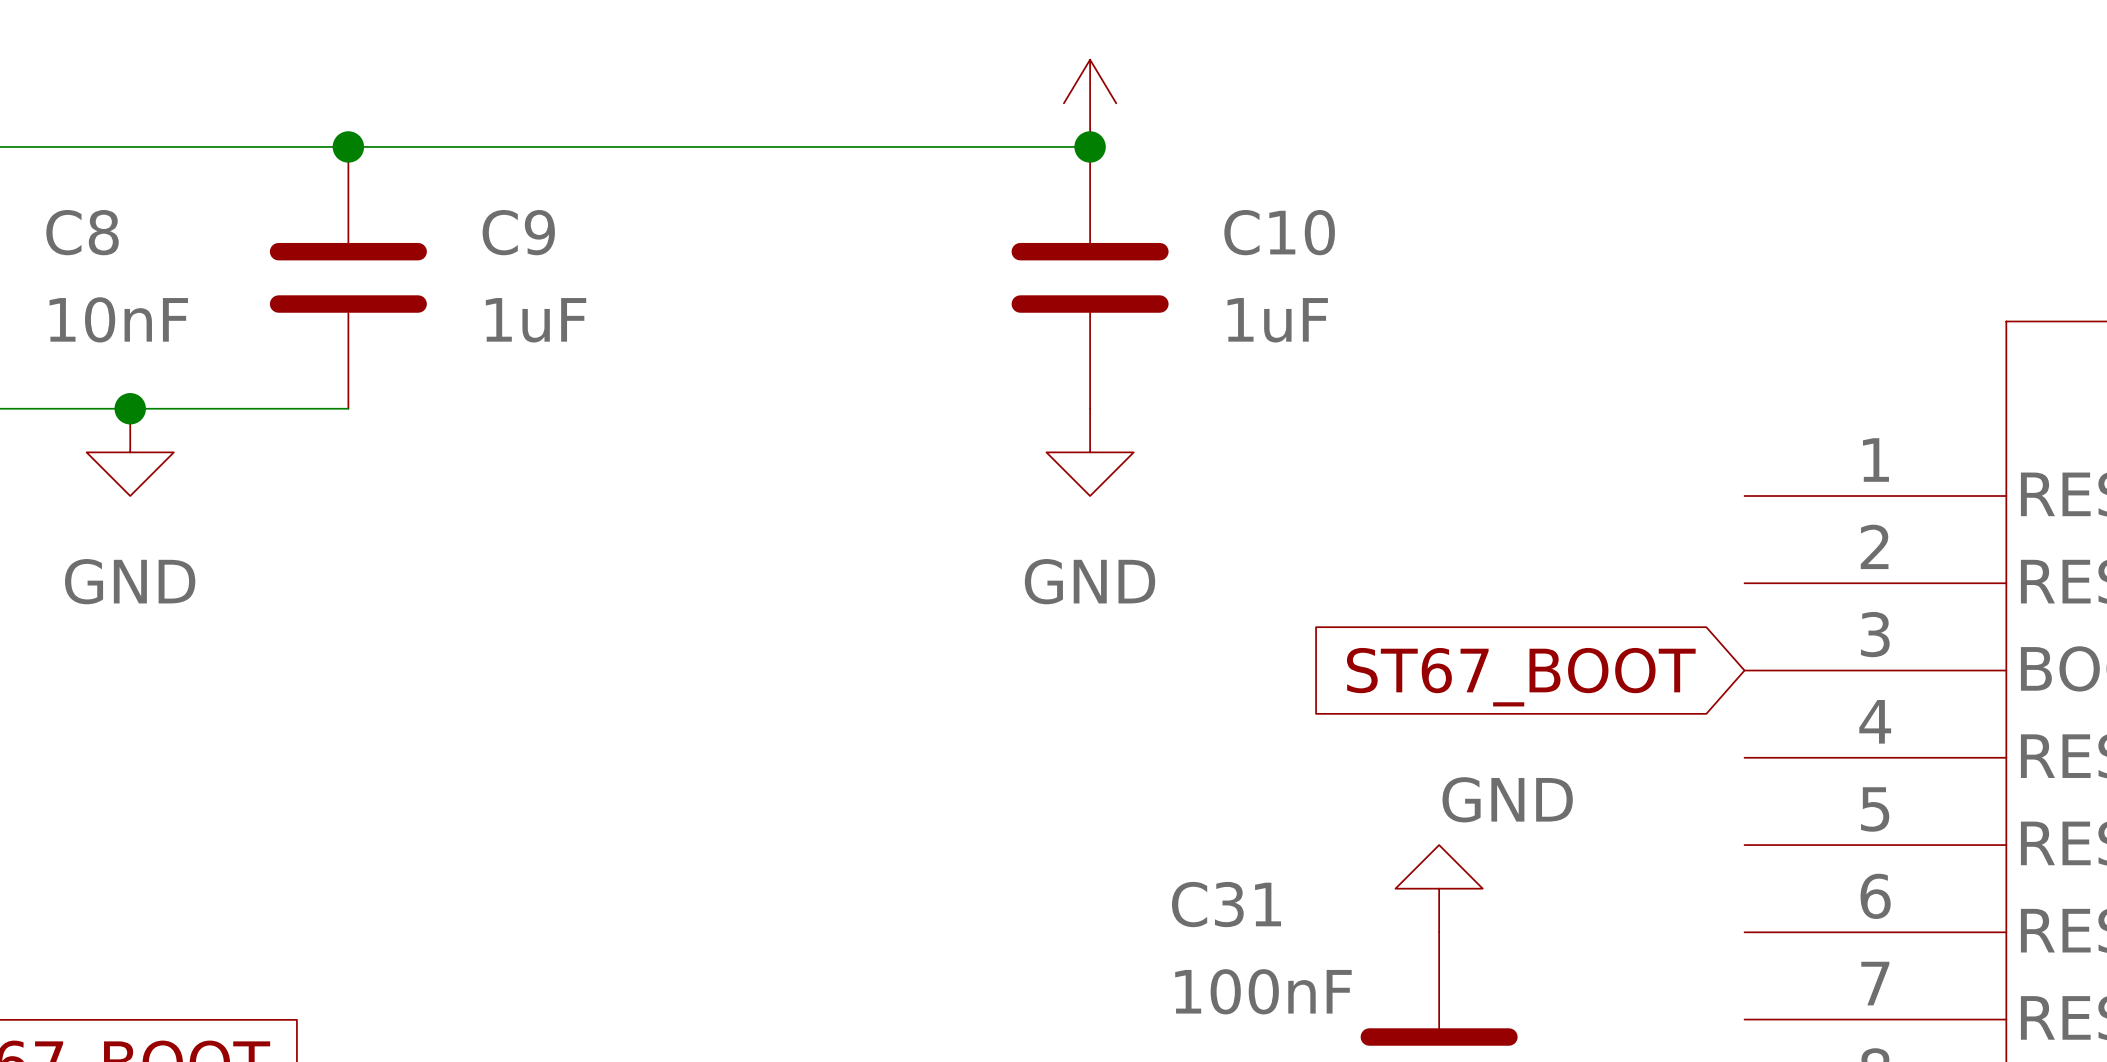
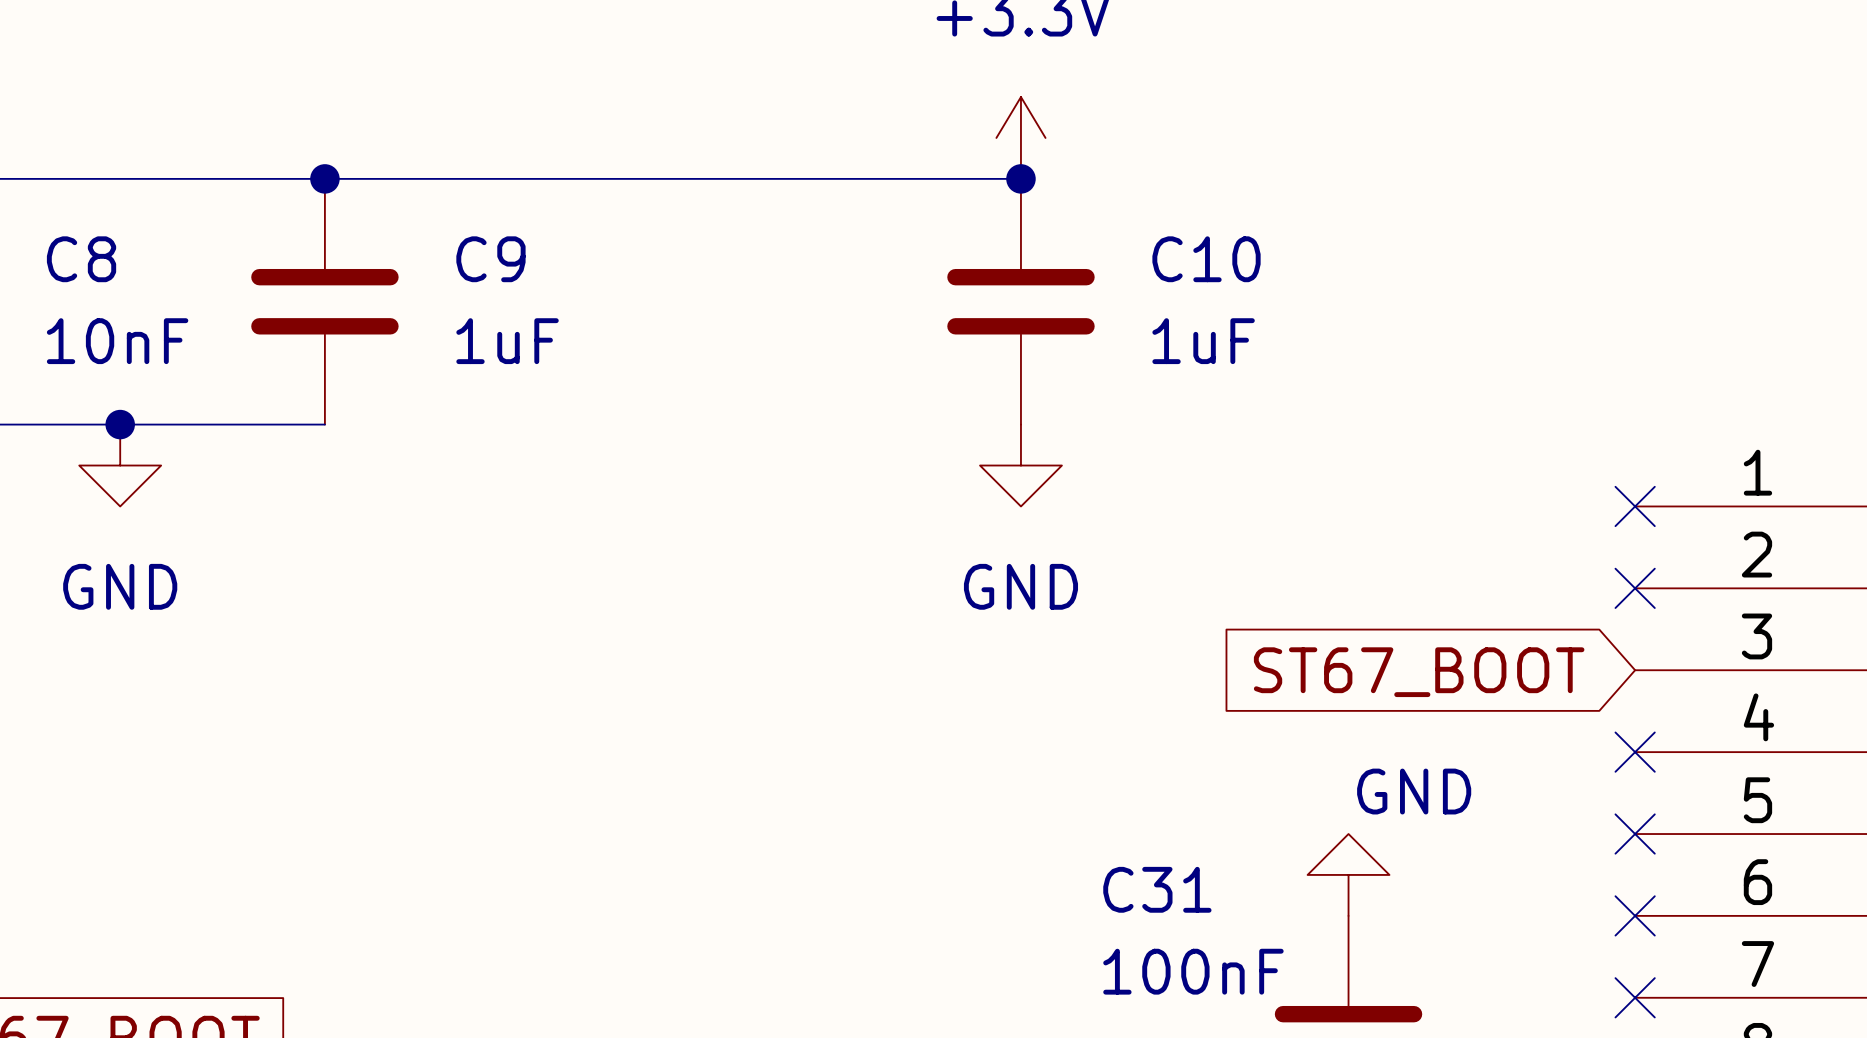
no-connect mark: none -> (1635, 506)
no-connect mark: none -> (1635, 588)
no-connect mark: none -> (1635, 752)
no-connect mark: none -> (1635, 834)
no-connect mark: none -> (1635, 915)
no-connect mark: none -> (1635, 997)

